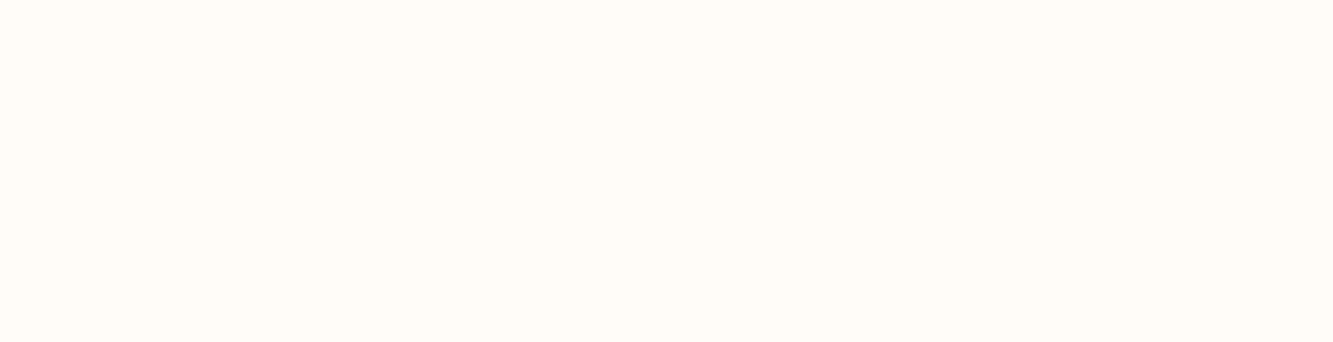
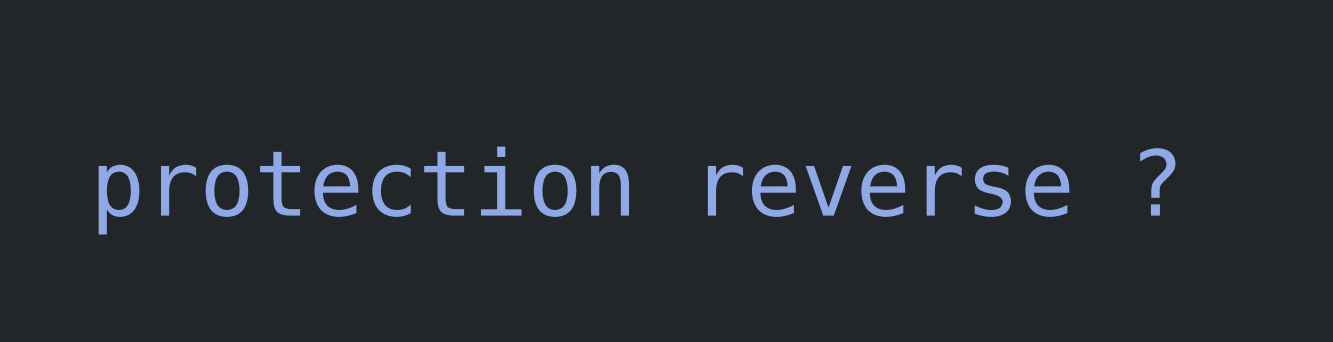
text: none -> protection reverse ? (637, 190)

